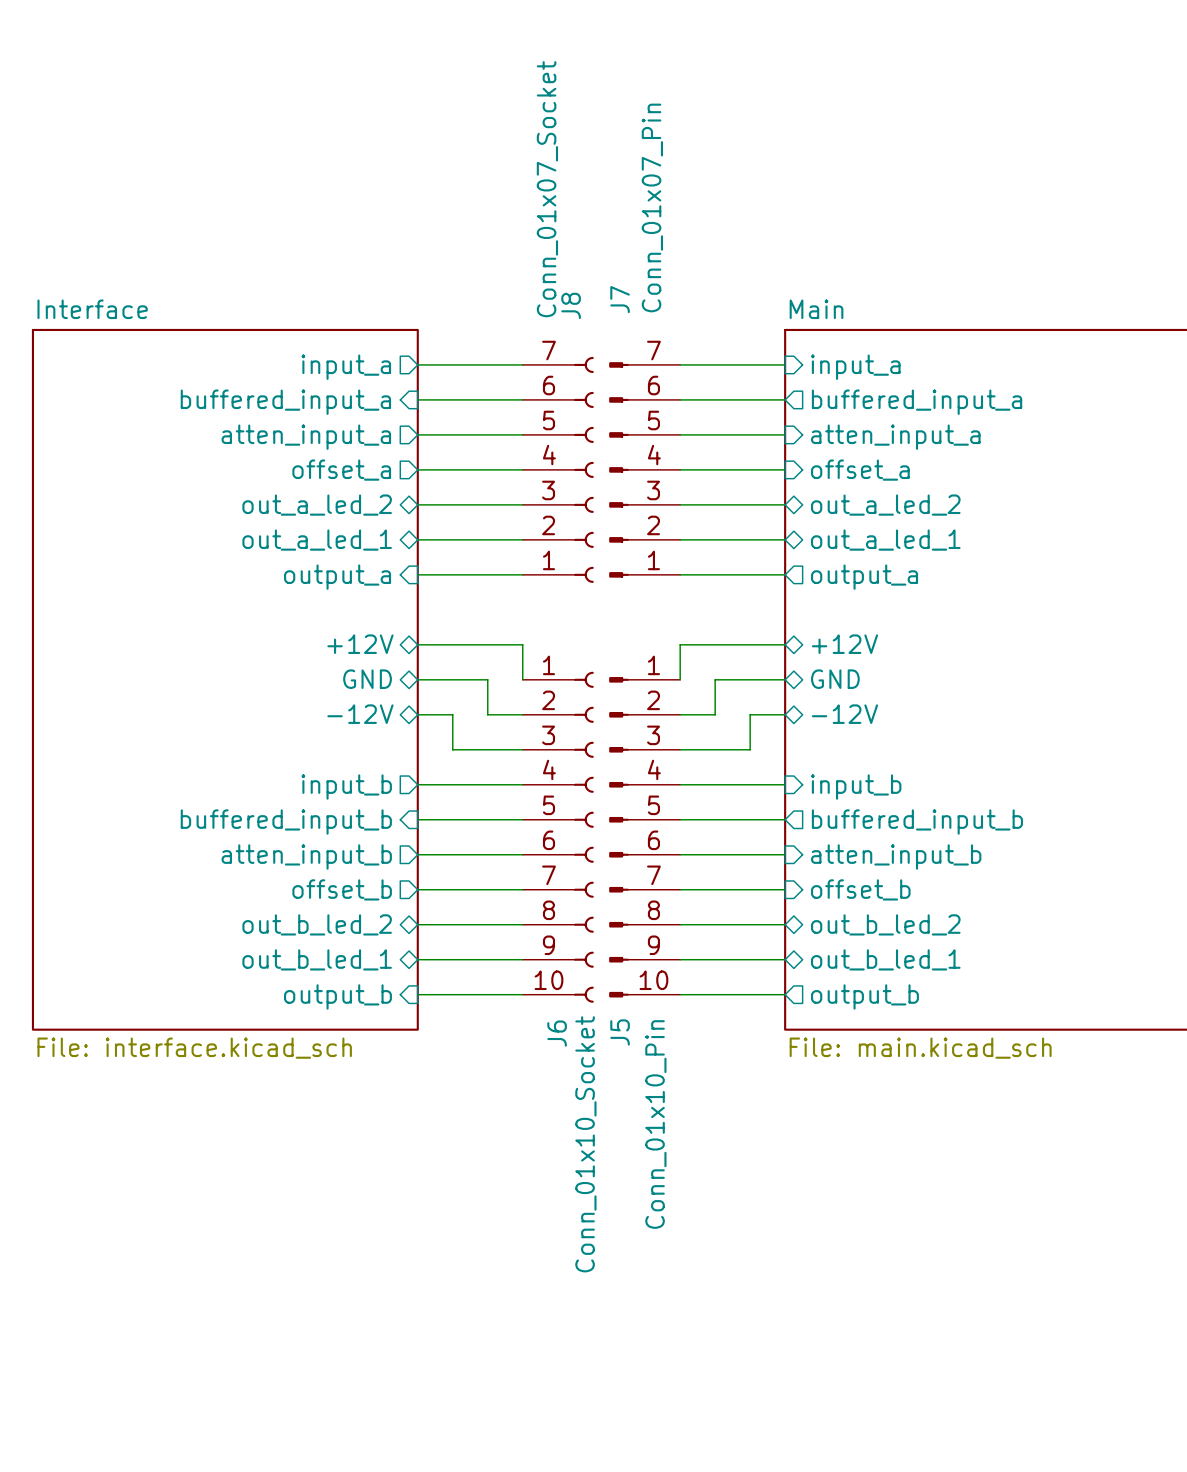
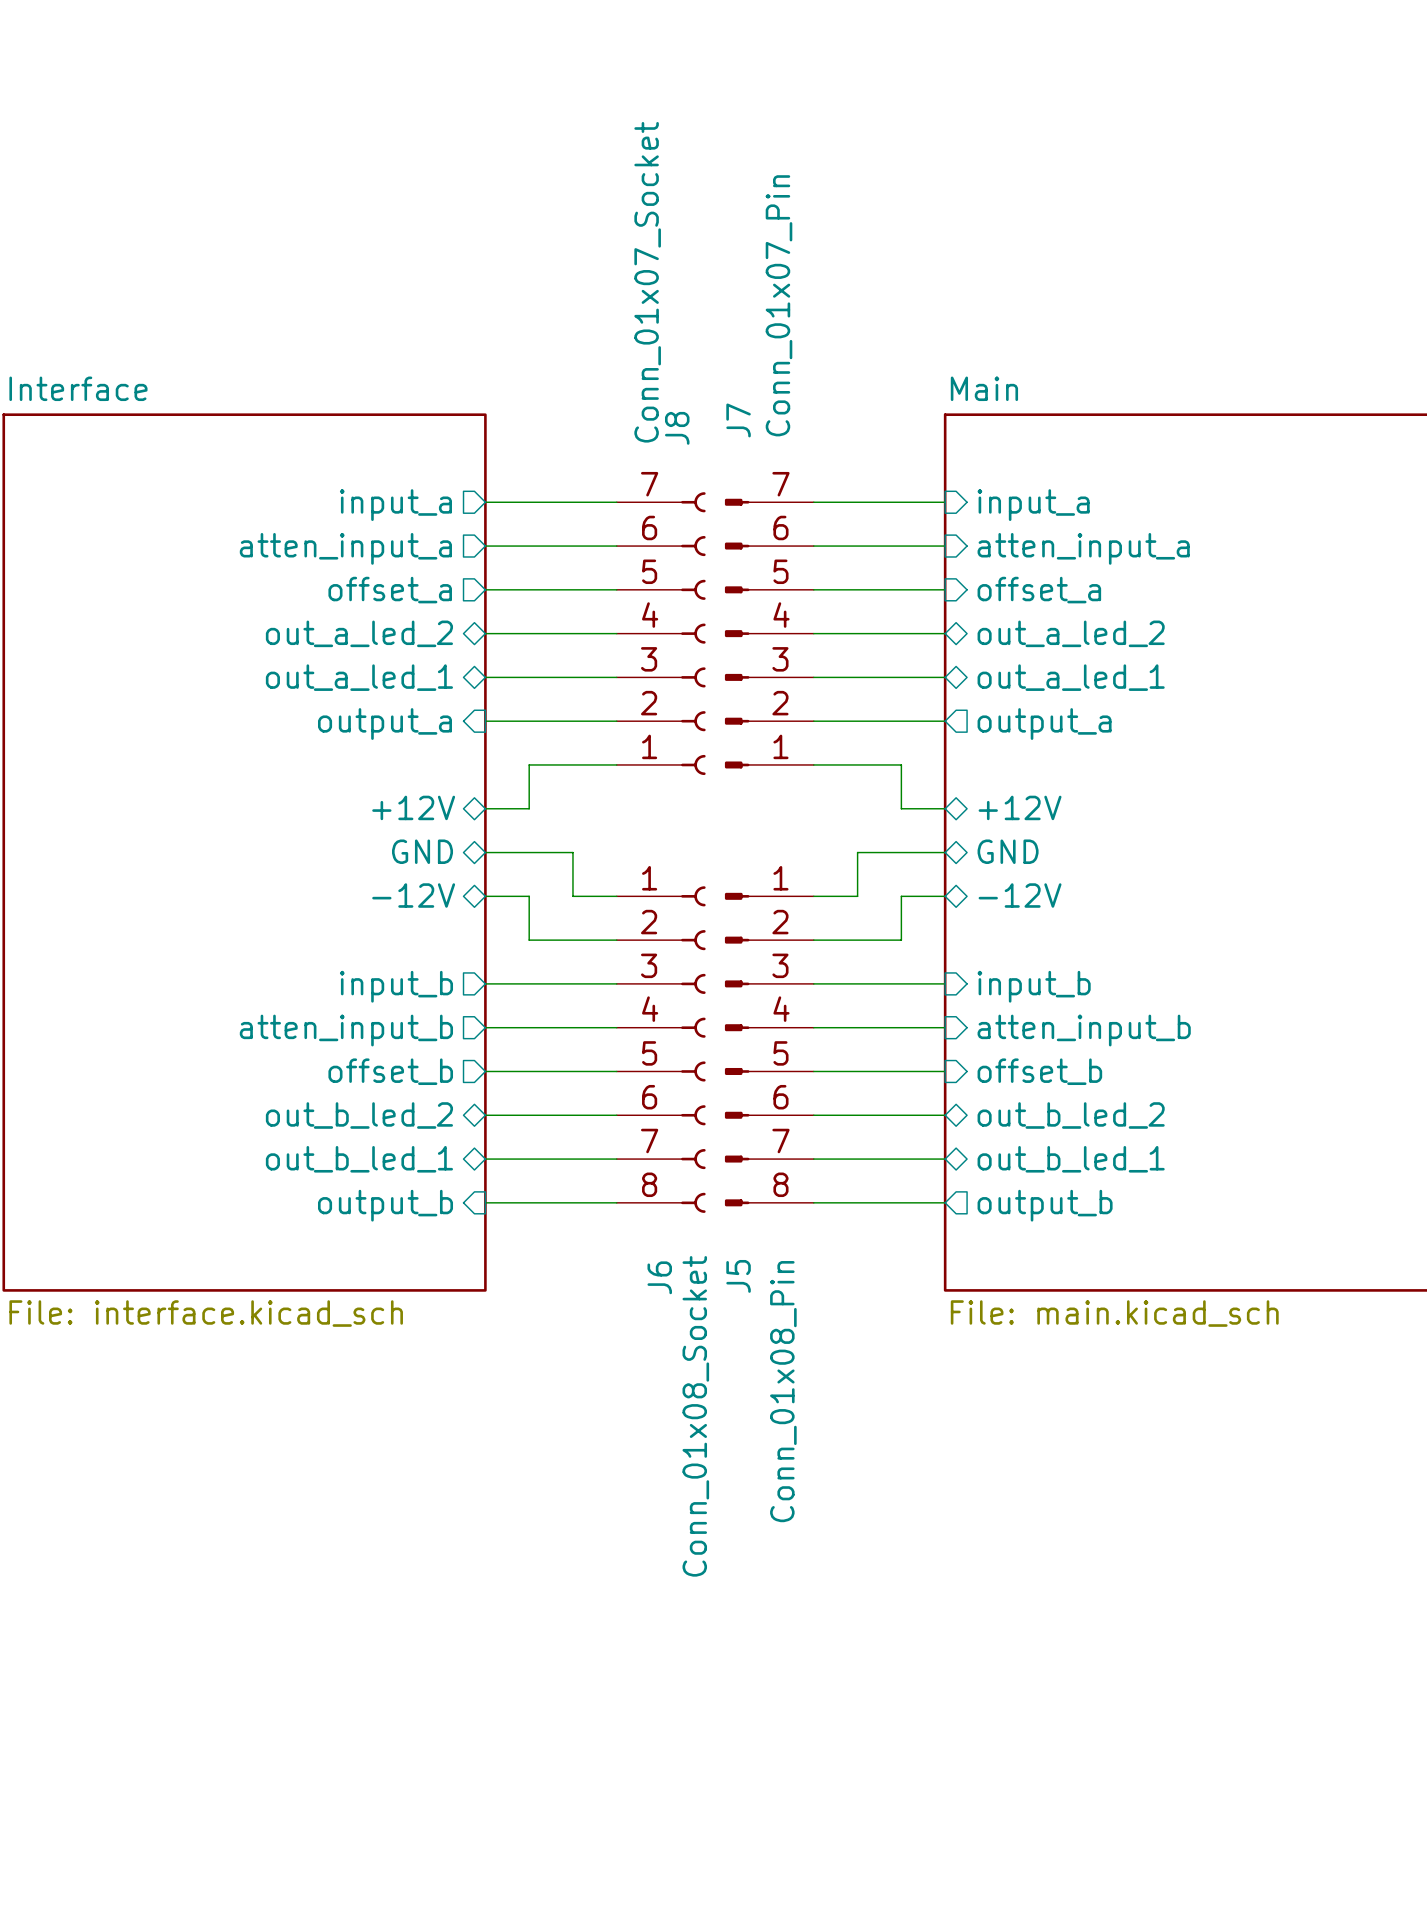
wire: (417, 364) (522, 364) -> none
wire: (680, 364) (785, 364) -> none
sheet pin: input_a (346, 367) -> none
sheet pin: input_a (855, 367) -> none
sheet pin shape: input (285, 402) -> output (395, 505)
sheet pin: buffered_input_a (285, 402) -> input_a (395, 505)
sheet pin shape: output (917, 402) -> input (1033, 505)
sheet pin: buffered_input_a (917, 402) -> input_a (1033, 505)
J8 position: (558, 469) -> (661, 633)
J7 position: (644, 469) -> (769, 633)
wire: (452, 644) (522, 644) (522, 679) -> (529, 808) (529, 764) (616, 764)
wire: (750, 644) (680, 644) (680, 679) -> (901, 808) (901, 764) (813, 764)
J6 symbol: [522, 671, 594, 1003] -> [616, 886, 706, 1213]
J5 symbol: [609, 677, 681, 998] -> [724, 892, 814, 1207]
sheet pin shape: input (286, 822) -> output (346, 1030)
sheet pin: buffered_input_b (286, 822) -> atten_input_b (346, 1030)
sheet pin shape: output (917, 822) -> input (1084, 1030)
sheet pin: buffered_input_b (917, 822) -> atten_input_b (1084, 1030)
sheet pin: atten_input_b (306, 857) -> offset_b (390, 1071)
sheet pin: atten_input_b (896, 857) -> offset_b (1039, 1071)
sheet pin shape: output (342, 889) -> bidirectional (359, 1115)
sheet pin: offset_b (342, 889) -> out_b_led_2 (359, 1115)
sheet pin shape: input (860, 889) -> bidirectional (1071, 1115)
sheet pin: offset_b (860, 889) -> out_b_led_2 (1071, 1115)
sheet pin: out_b_led_2 (317, 924) -> out_b_led_1 (359, 1159)
sheet pin: out_b_led_2 (885, 924) -> out_b_led_1 (1071, 1159)
sheet pin shape: bidirectional (317, 959) -> input (385, 1205)
sheet pin: out_b_led_1 (317, 959) -> output_b (385, 1205)
sheet pin shape: bidirectional (885, 959) -> output (1045, 1205)
sheet pin: out_b_led_1 (885, 959) -> output_b (1045, 1205)
wire: (417, 994) (522, 994) -> none
wire: (680, 994) (785, 994) -> none
sheet pin: output_b (337, 996) -> none
sheet pin: output_b (864, 996) -> none
J5 value: Conn_01x10_Pin (655, 1124) -> Conn_01x08_Pin (783, 1391)
J6 value: Conn_01x10_Socket (585, 1144) -> Conn_01x08_Socket (695, 1416)

